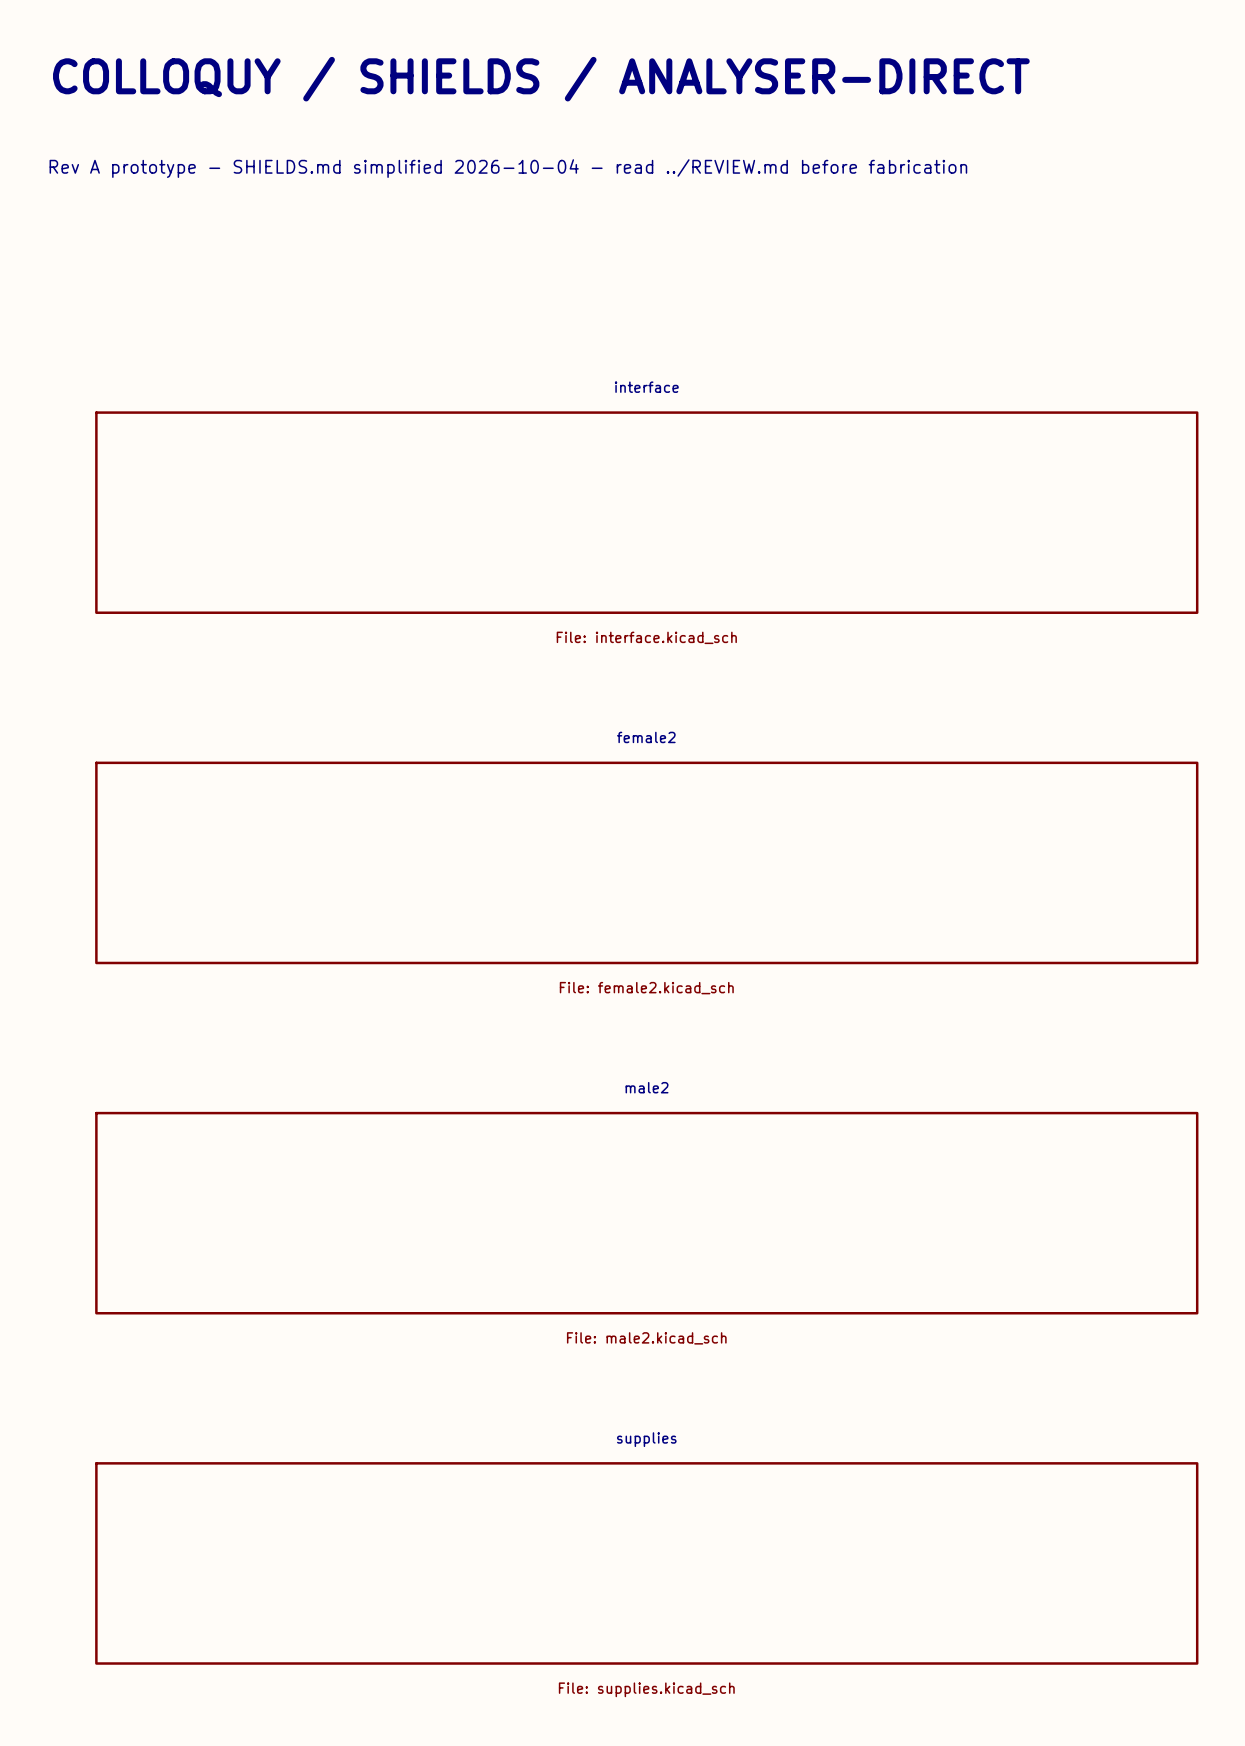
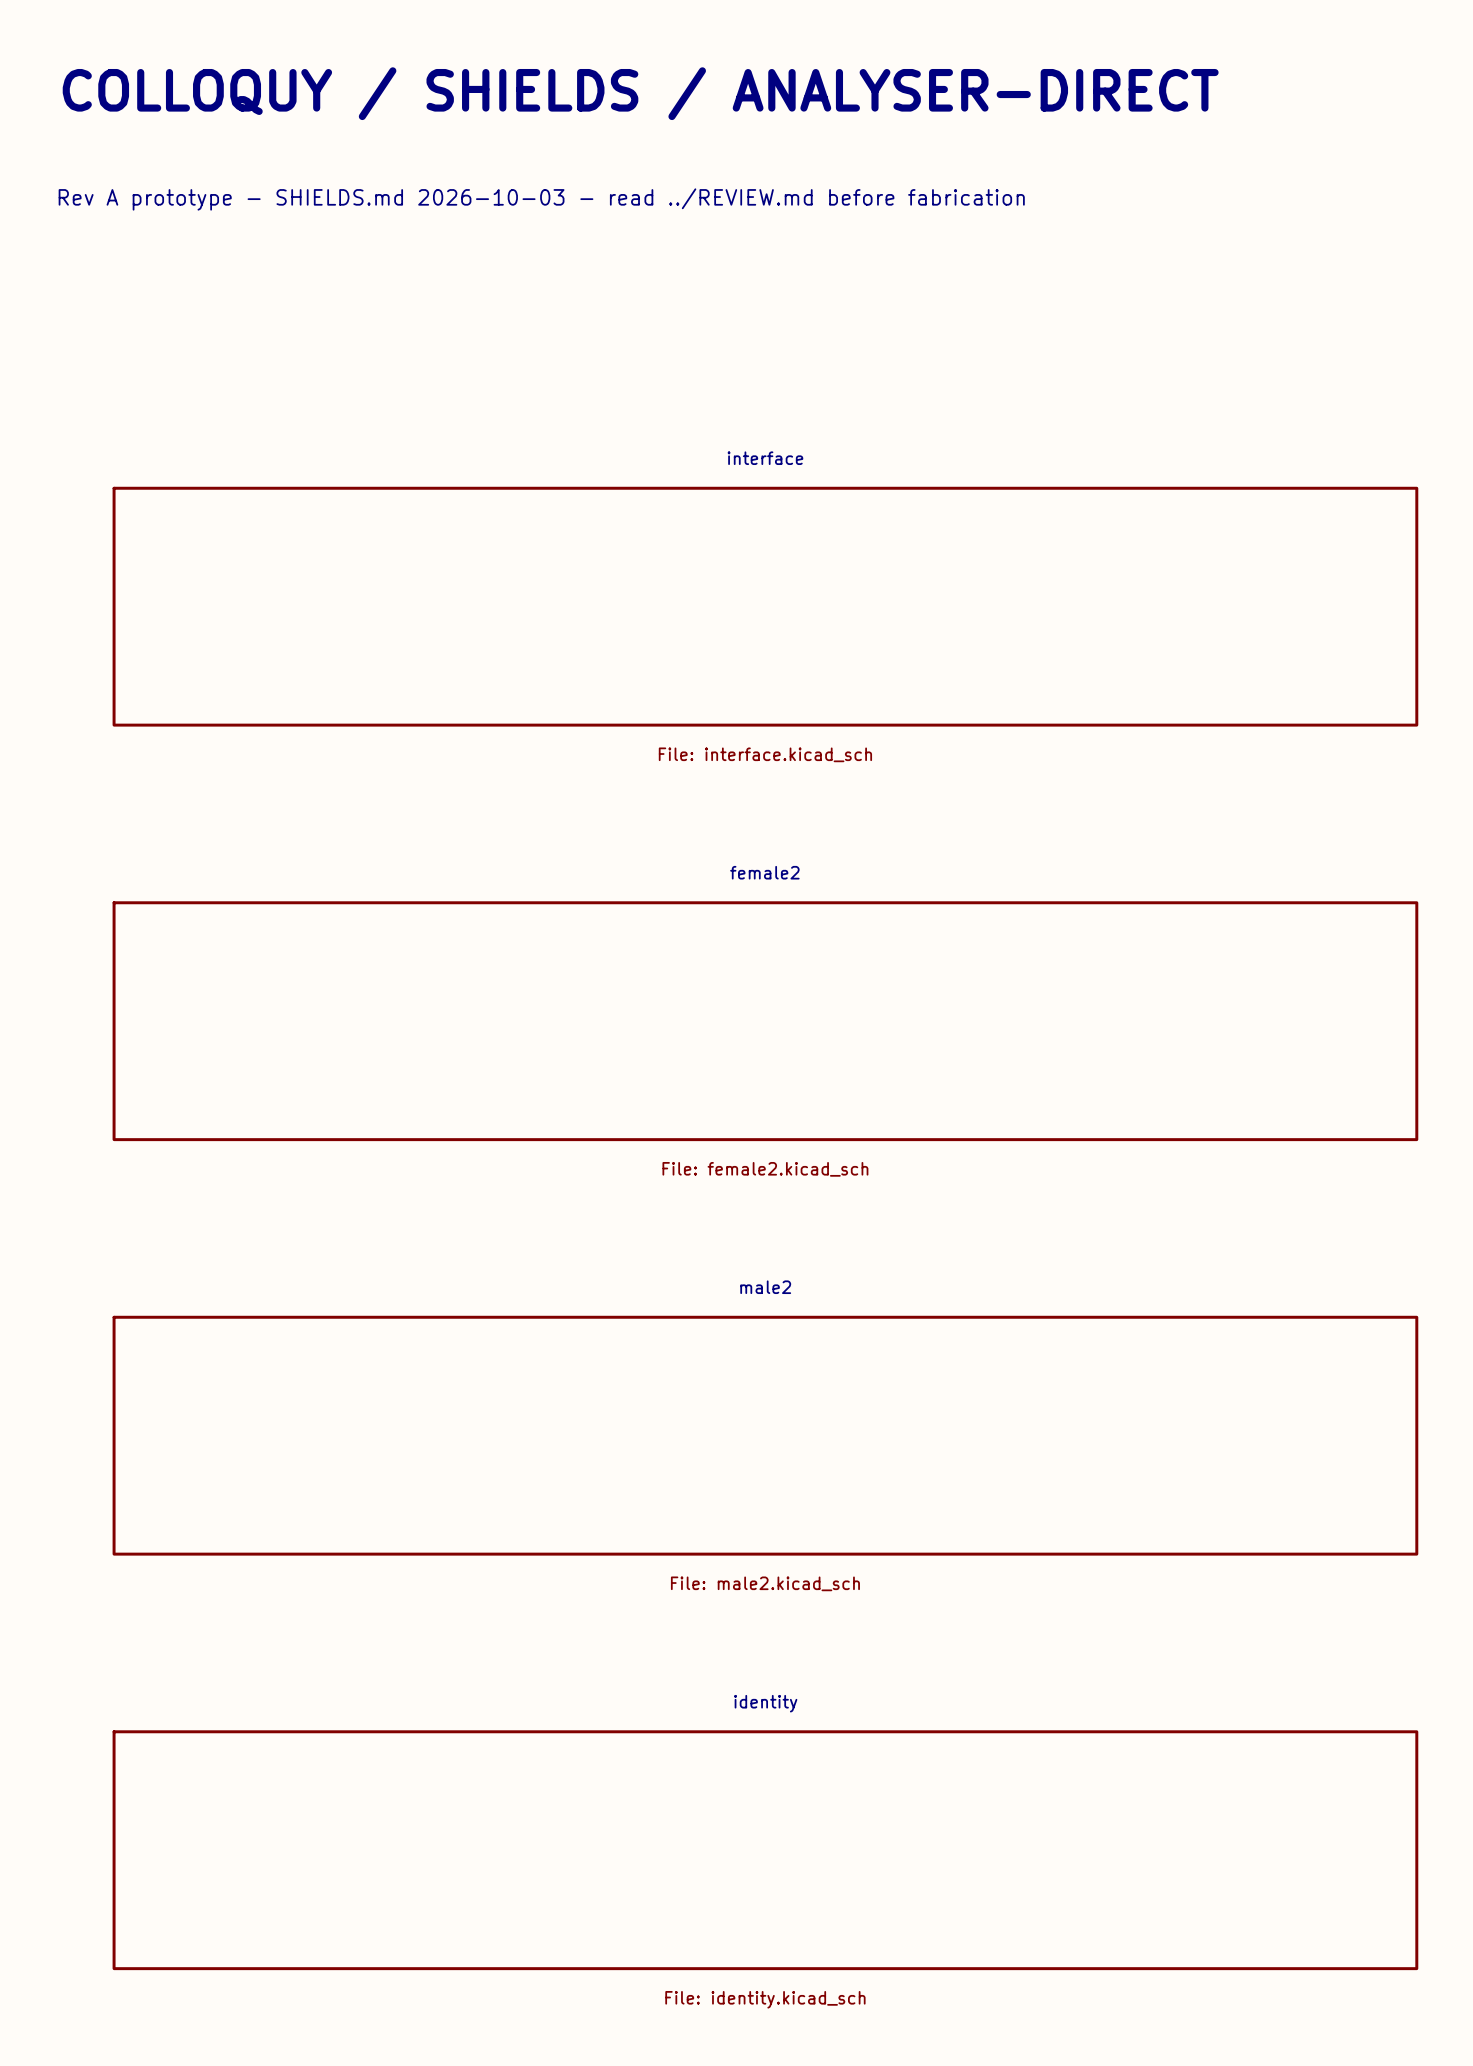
text: Rev A prototype - SHIELDS.md simplified 2026-10-04 - read ../REVIEW.md before fabrication (508, 168) -> Rev A prototype - SHIELDS.md 2026-10-03 - read ../REVIEW.md before fabrication (541, 199)
sheet supplies name: supplies (646, 1439) -> identity (765, 1703)
sheet supplies value: File: supplies.kicad_sch (646, 1689) -> File: identity.kicad_sch (765, 1999)

